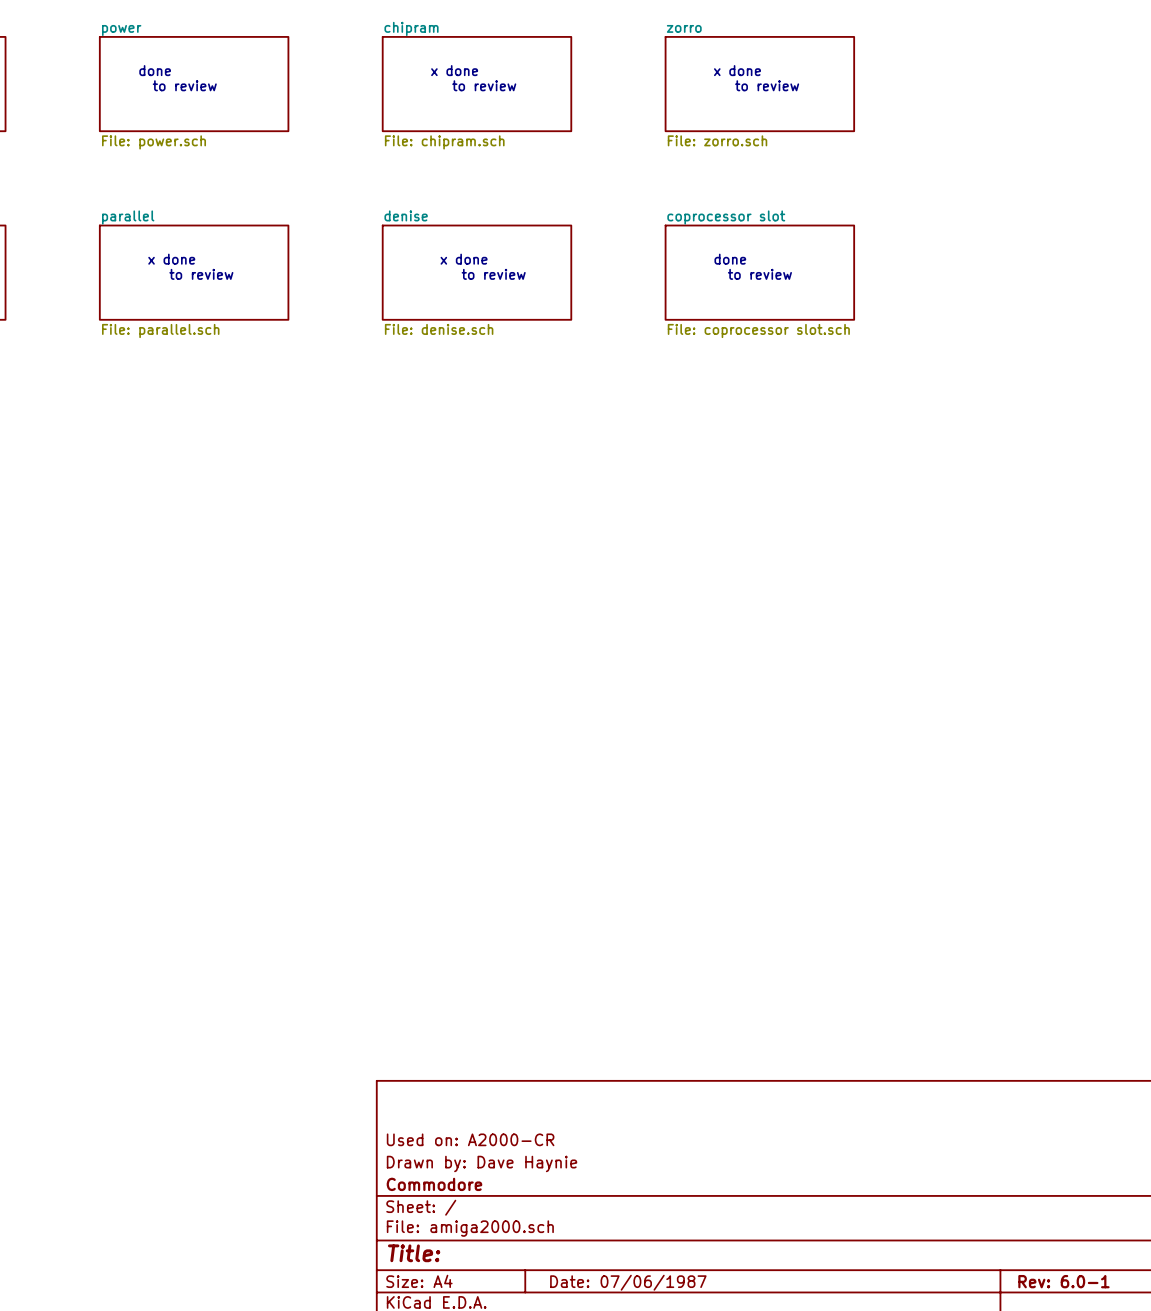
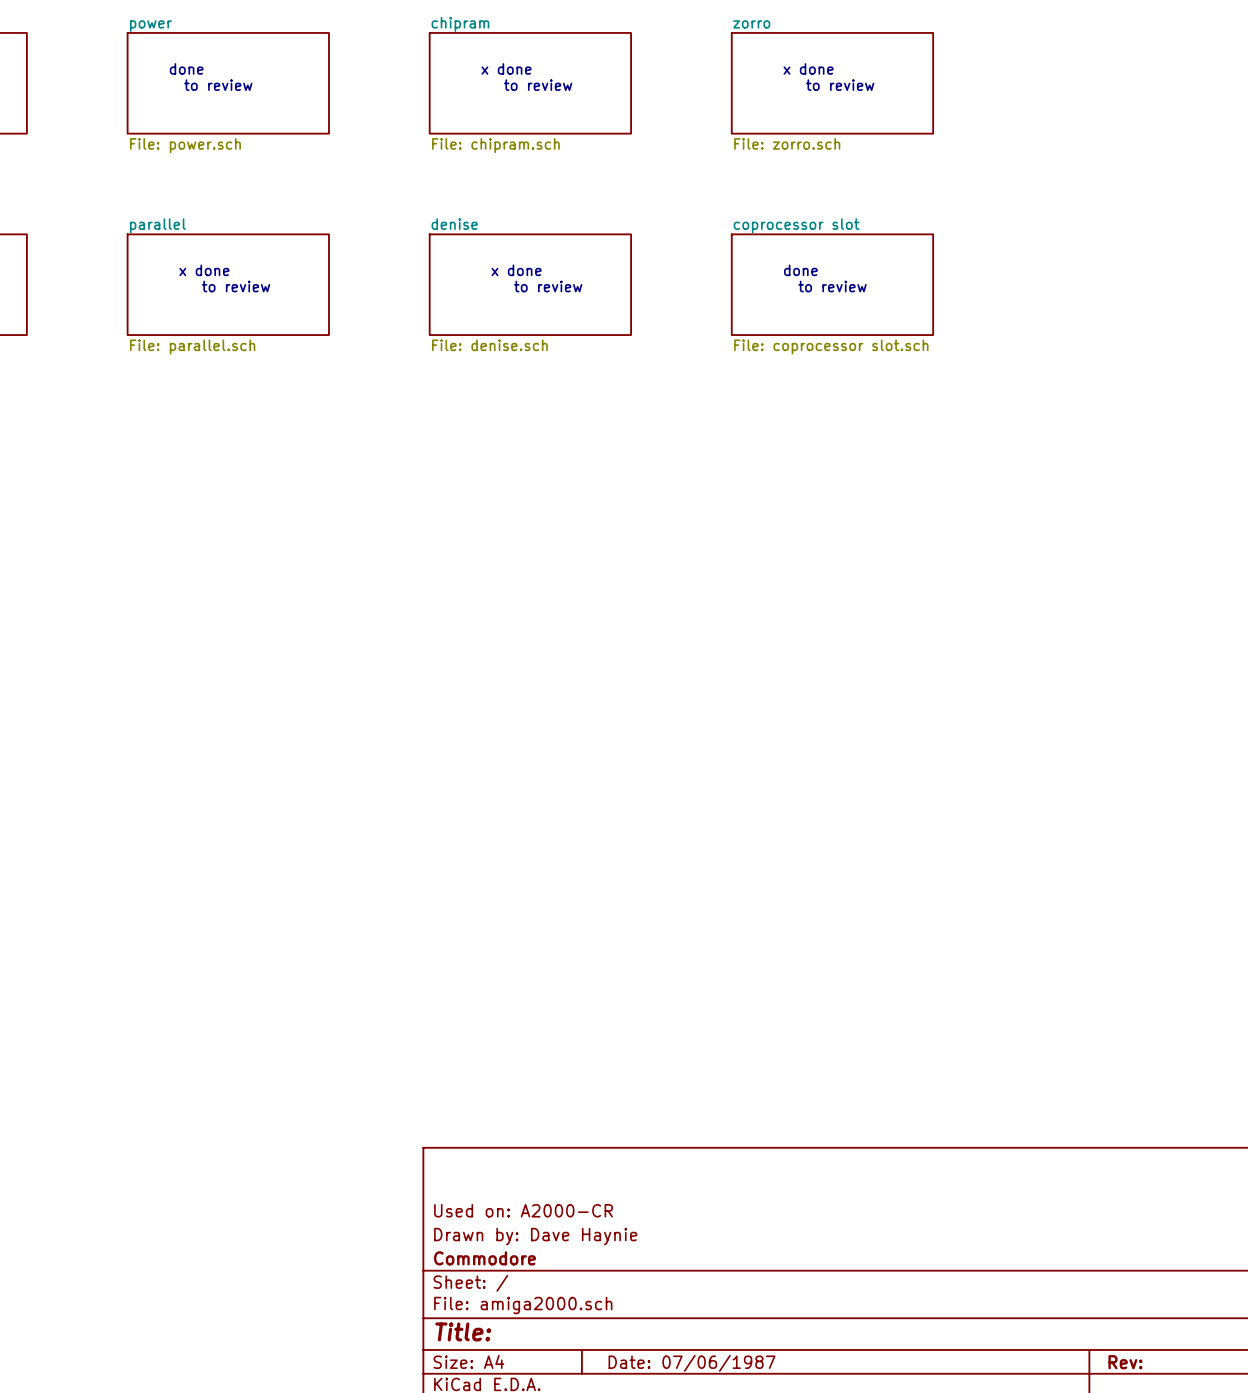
title block: Rev: 6.0-1 (1063, 1281) -> Rev: (1125, 1362)

